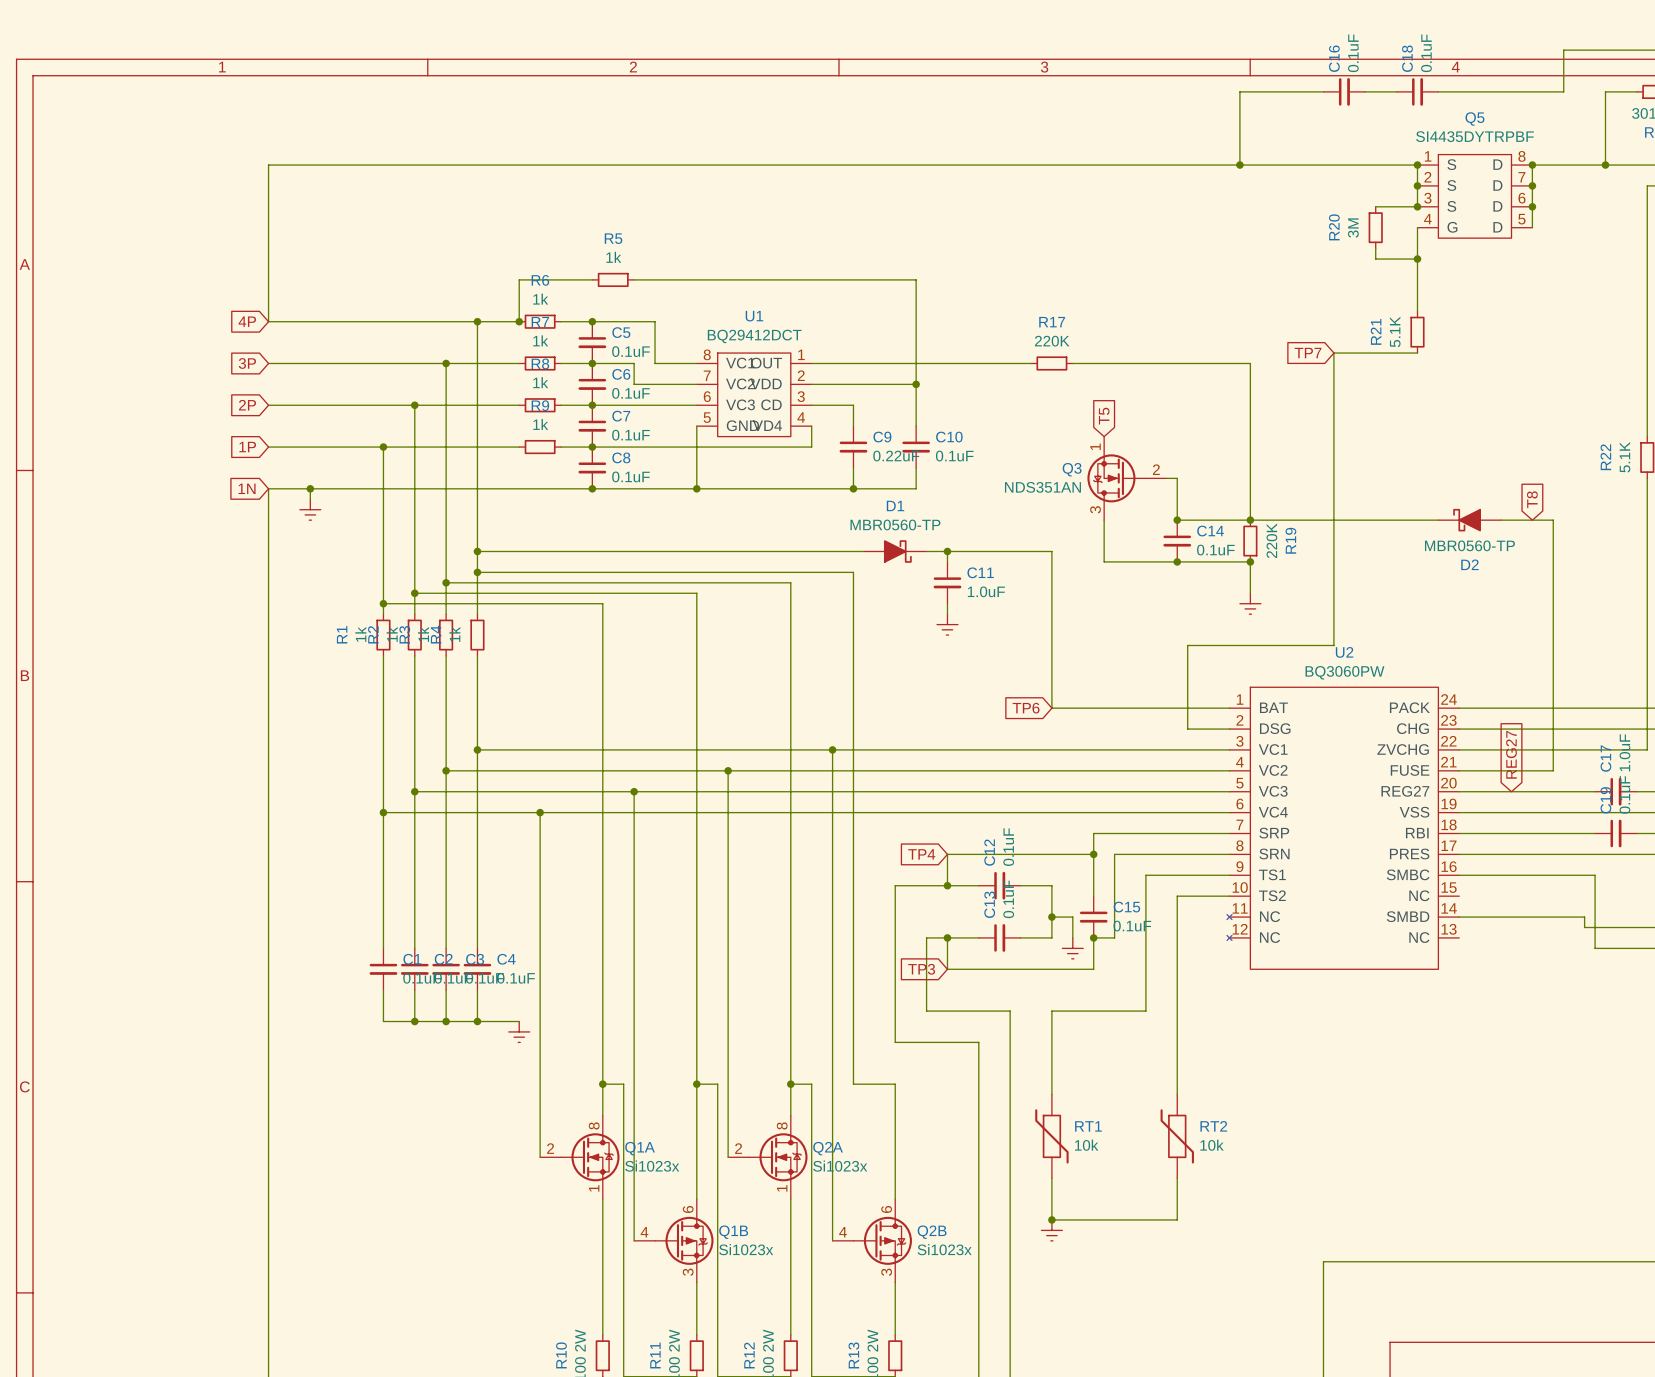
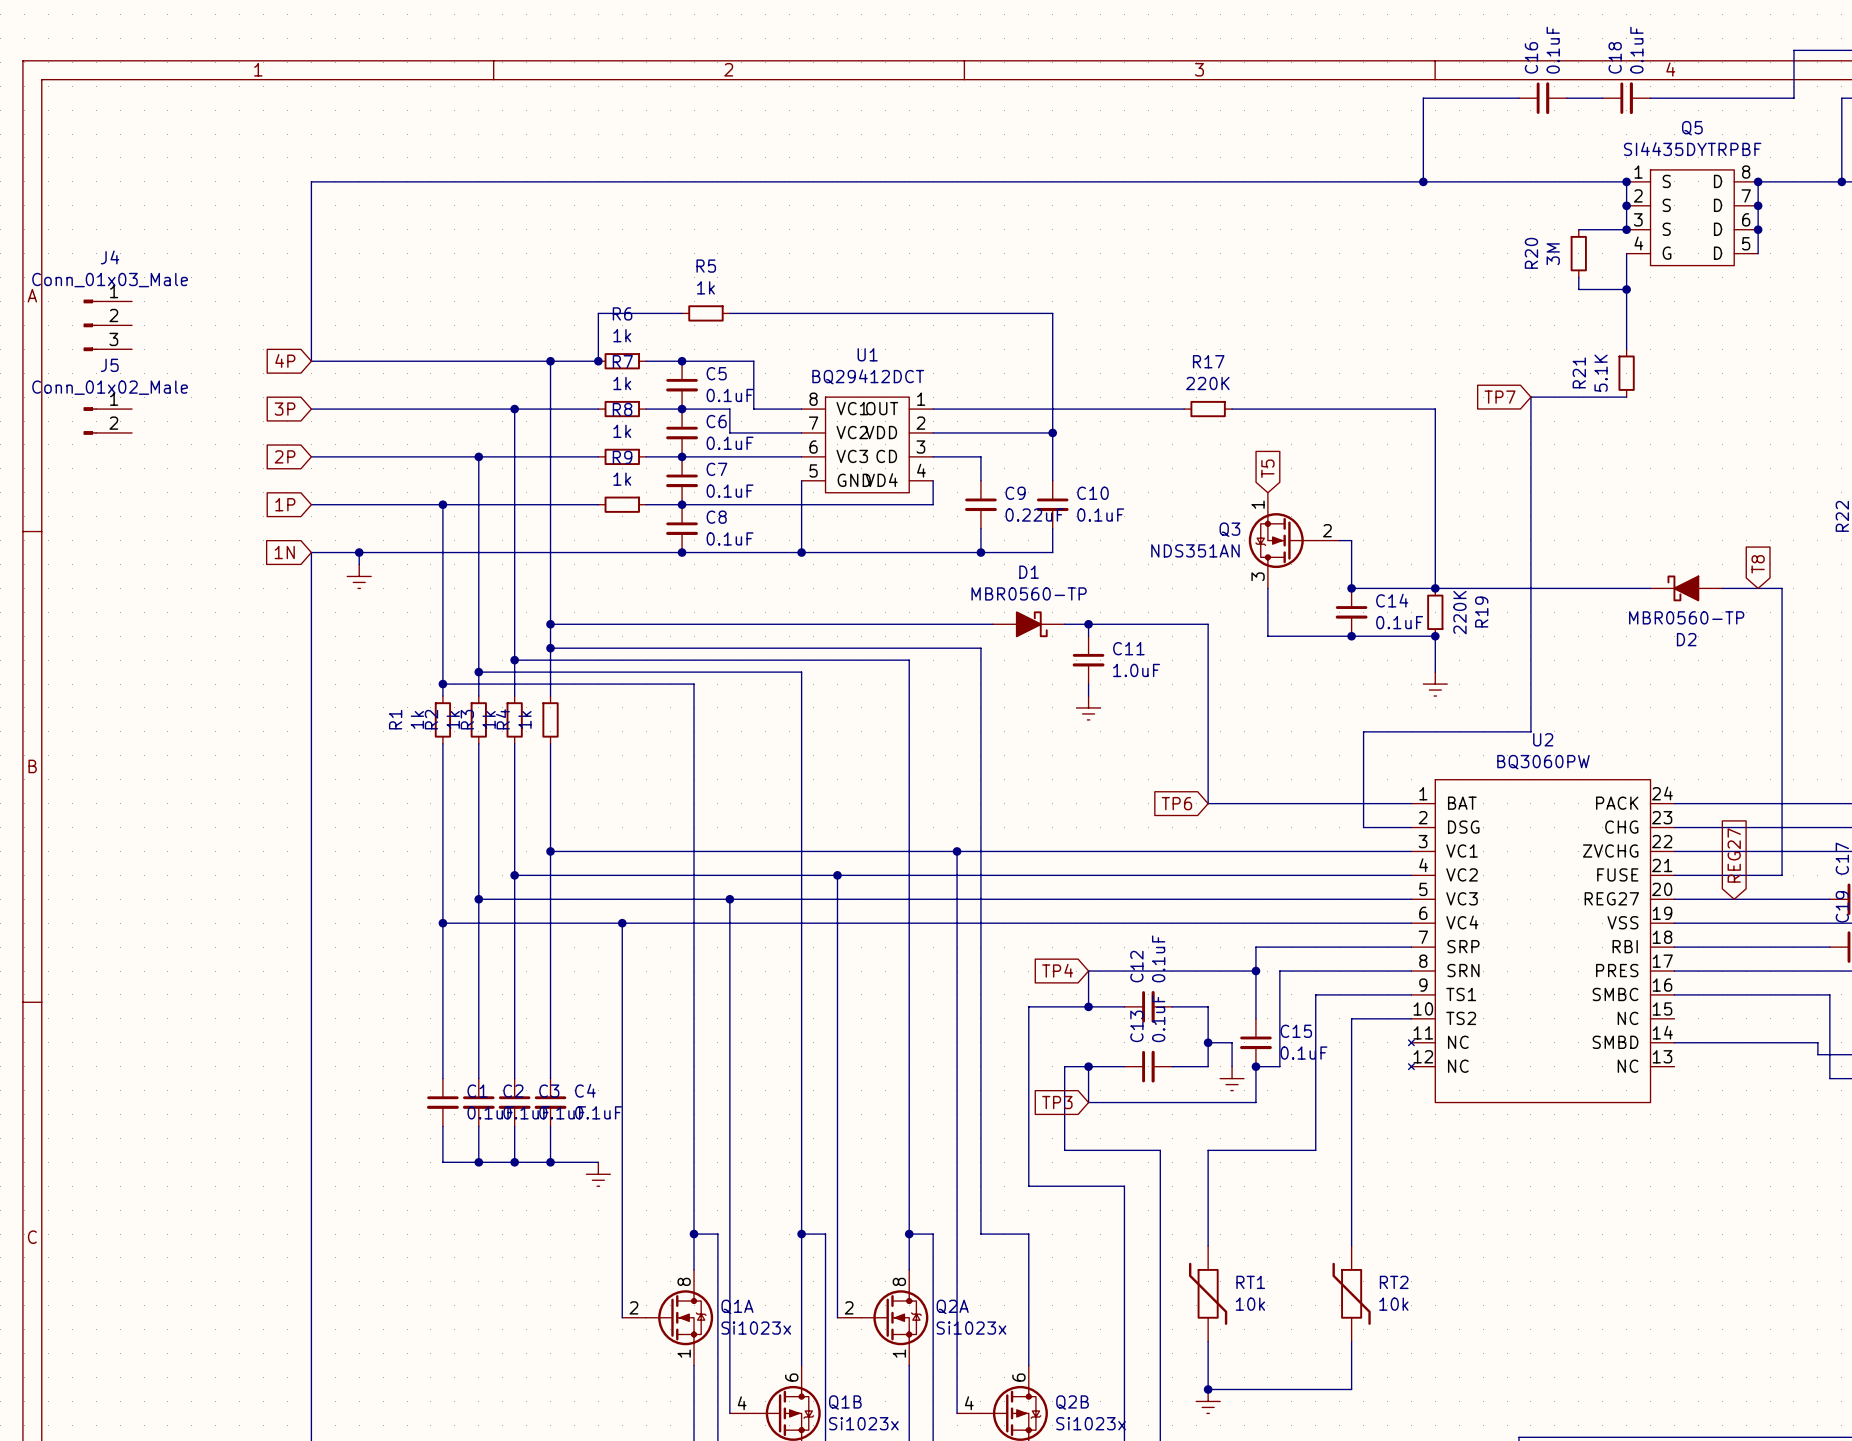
J4: none -> Conn_01x03_Male (107, 325)
J5: none -> Conn_01x02_Male (107, 421)

